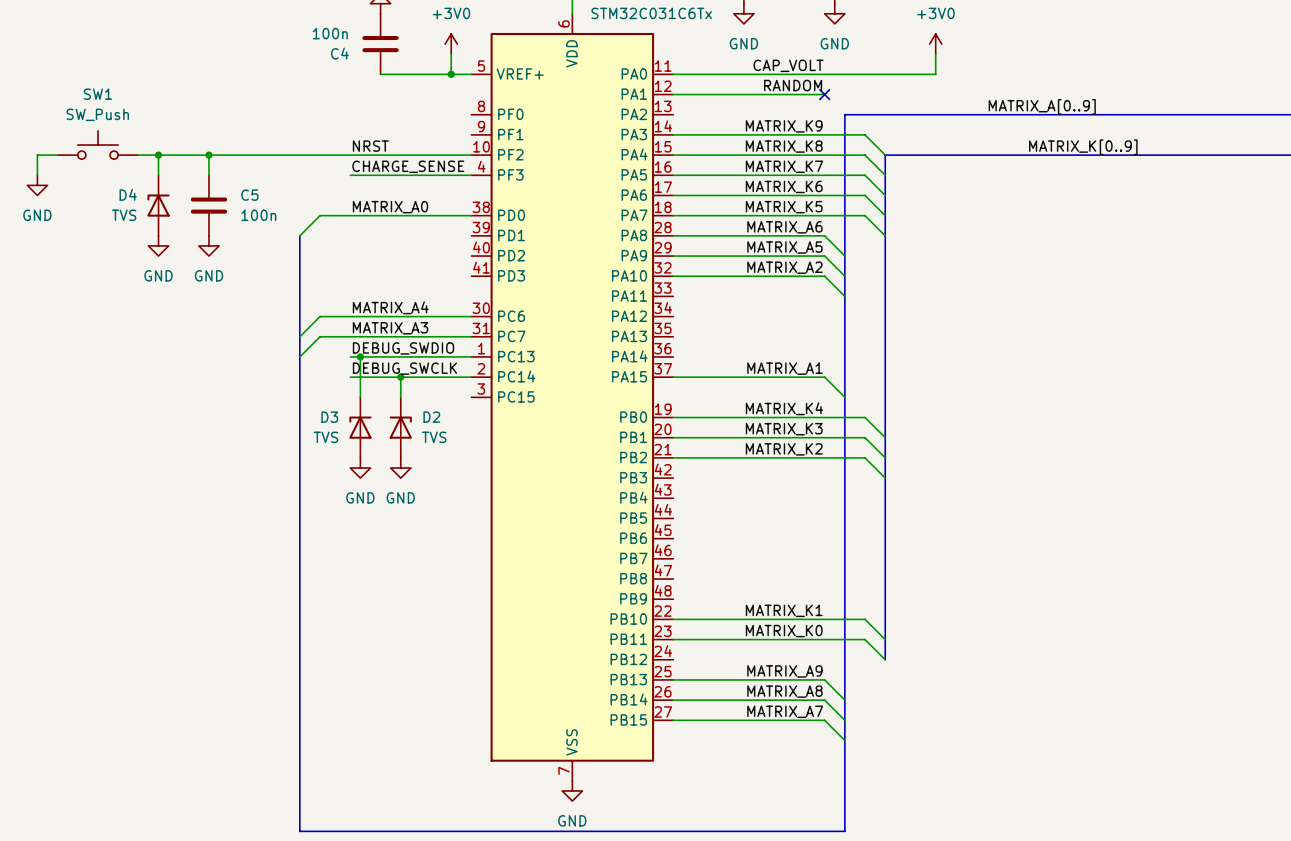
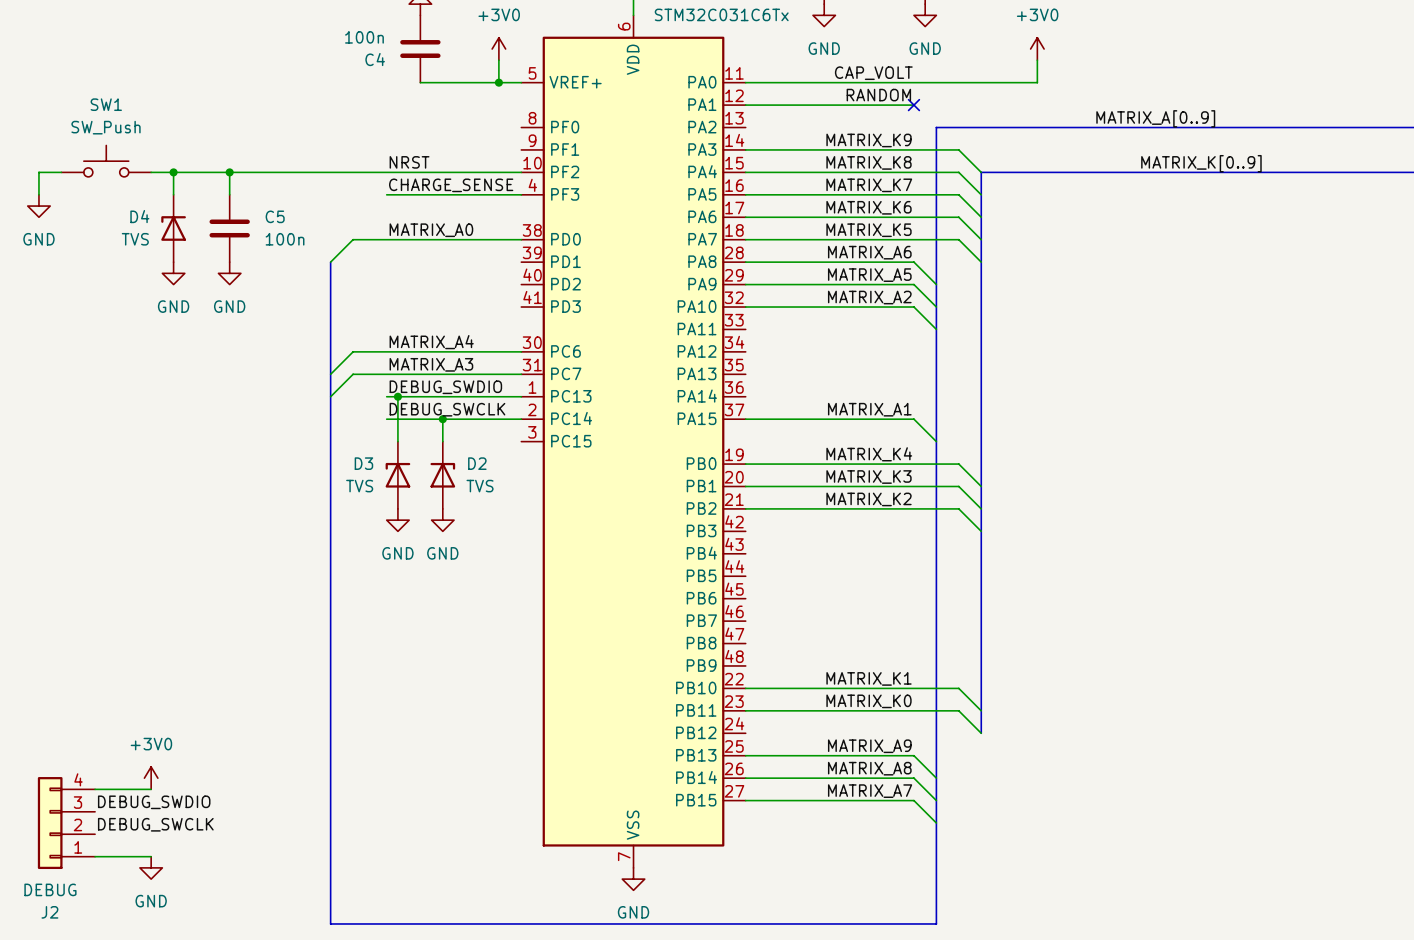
power symbol: none -> +3V0 (151, 778)
wire: none -> (95, 789) (151, 789)
label: none -> DEBUG_SWDIO (154, 802)
J2: none -> DEBUG (66, 823)
label: none -> DEBUG_SWCLK (155, 824)
wire: none -> (95, 856) (151, 856)
power symbol: none -> GND (151, 867)

